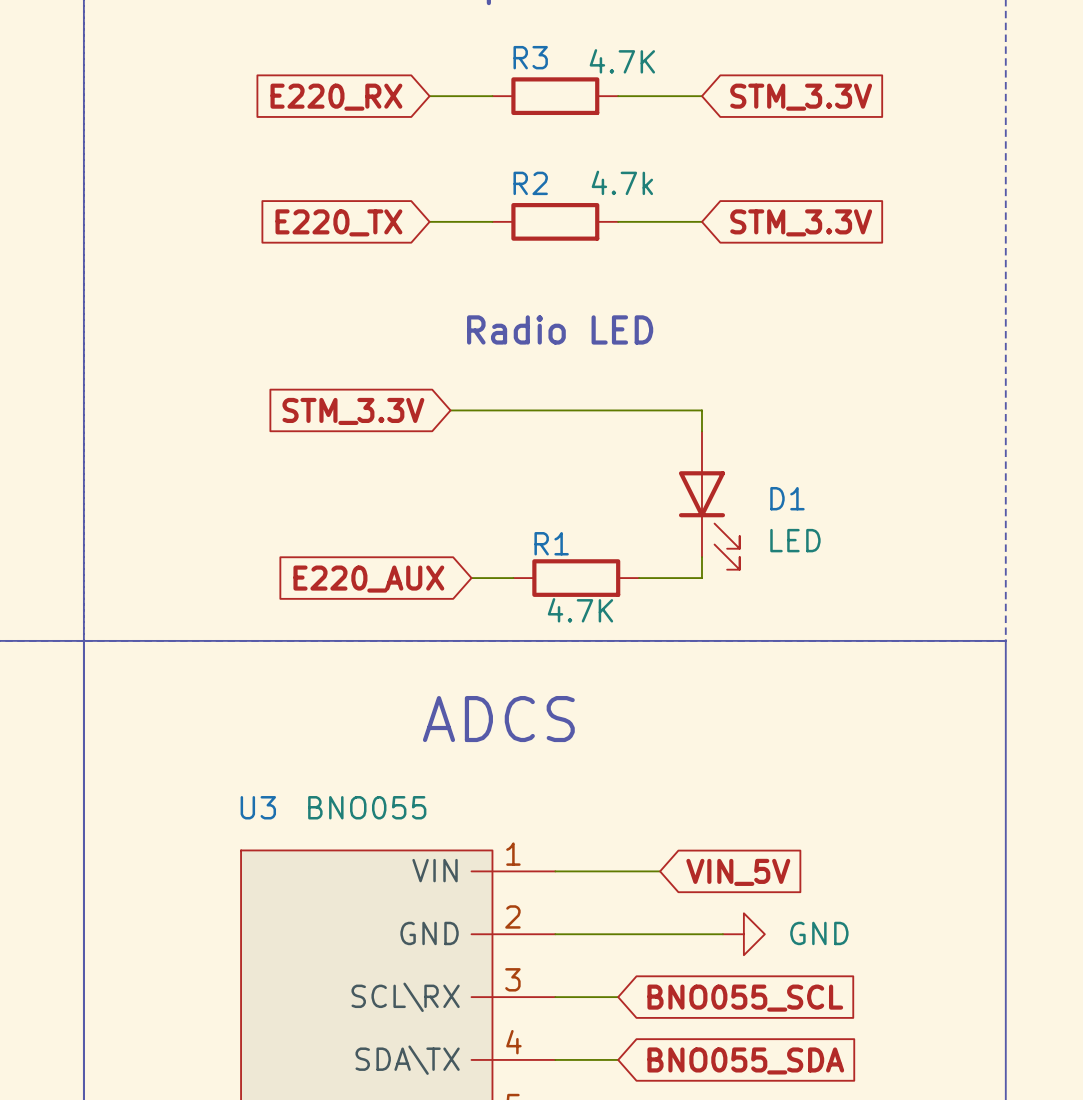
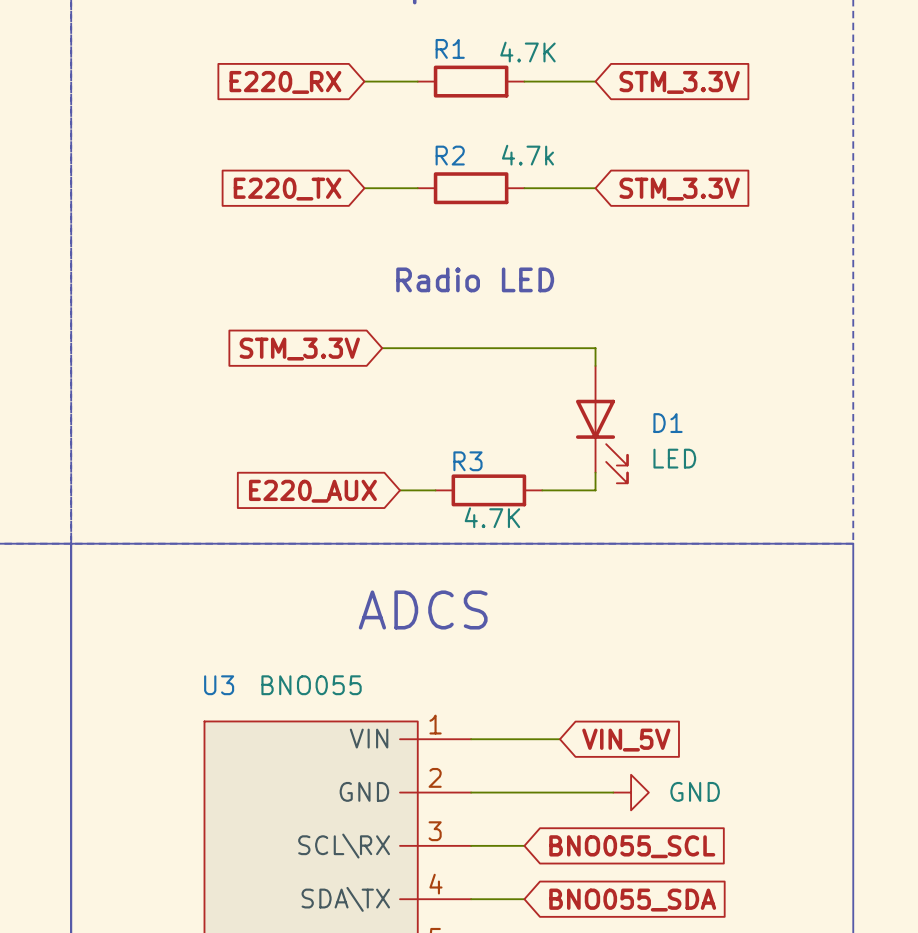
R3 name: R3 (530, 57) -> R1 (450, 48)
R1 name: R1 (551, 543) -> R3 (467, 461)

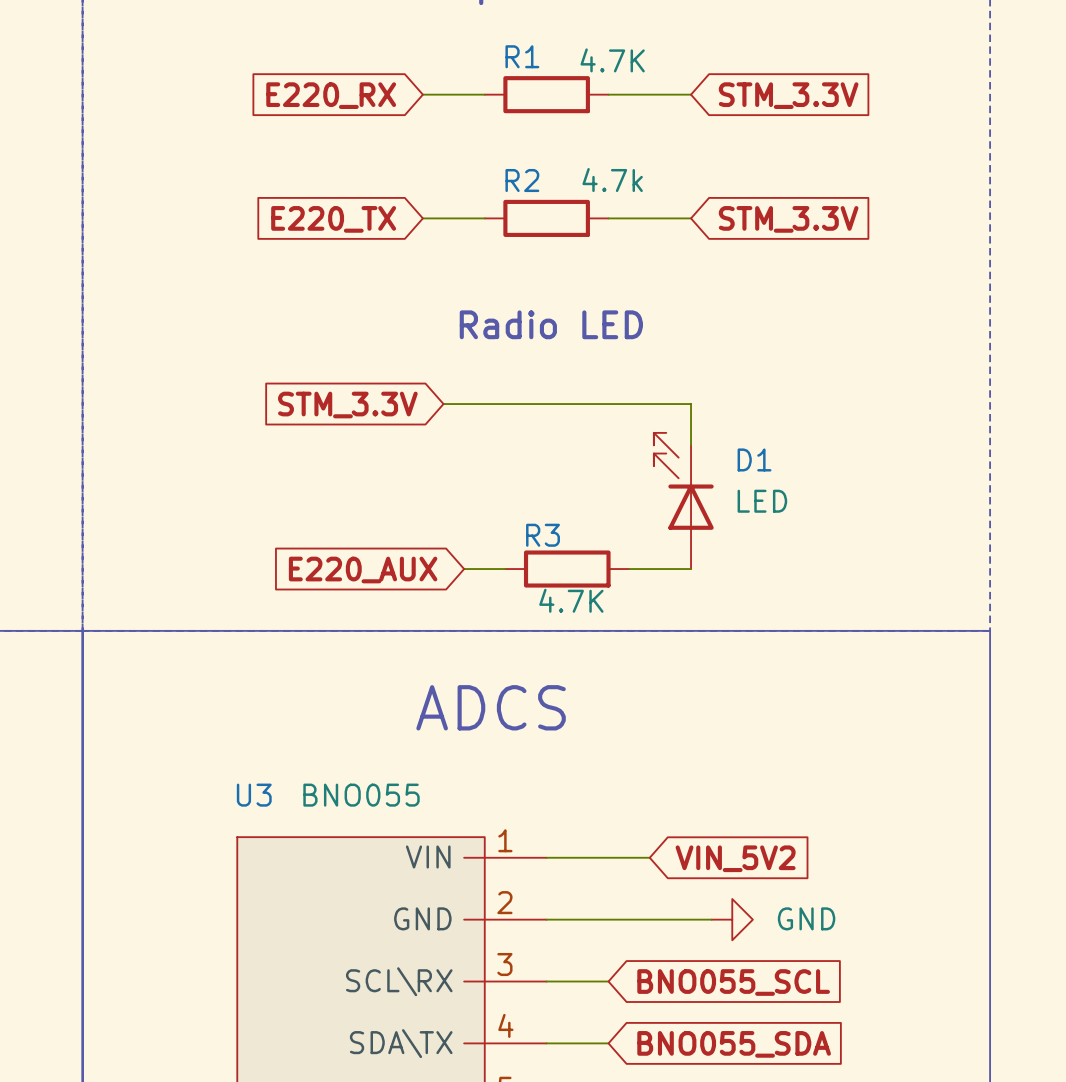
D1 name position: D1 (668, 423) -> D1 (754, 459)
D1 rotation: 0° (601, 441) -> 180° (683, 481)
D1 value position: LED (674, 458) -> LED (762, 501)
global label: VIN_5V (626, 740) -> VIN_5V2 (735, 858)

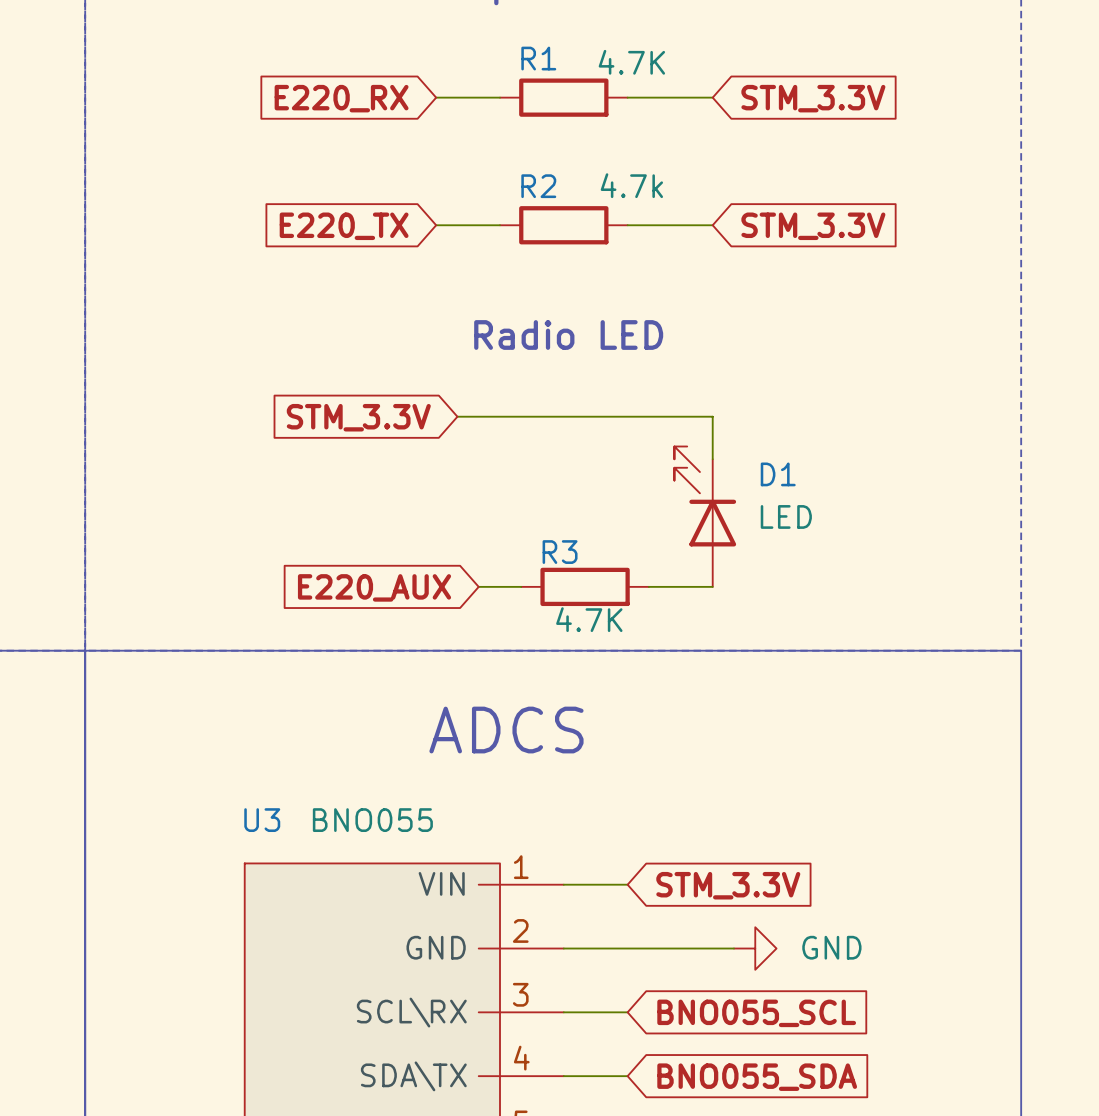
wire: (608, 857) (649, 857) -> none
global label: none -> STM_3.3V (728, 885)
global label: VIN_5V2 (735, 858) -> none

